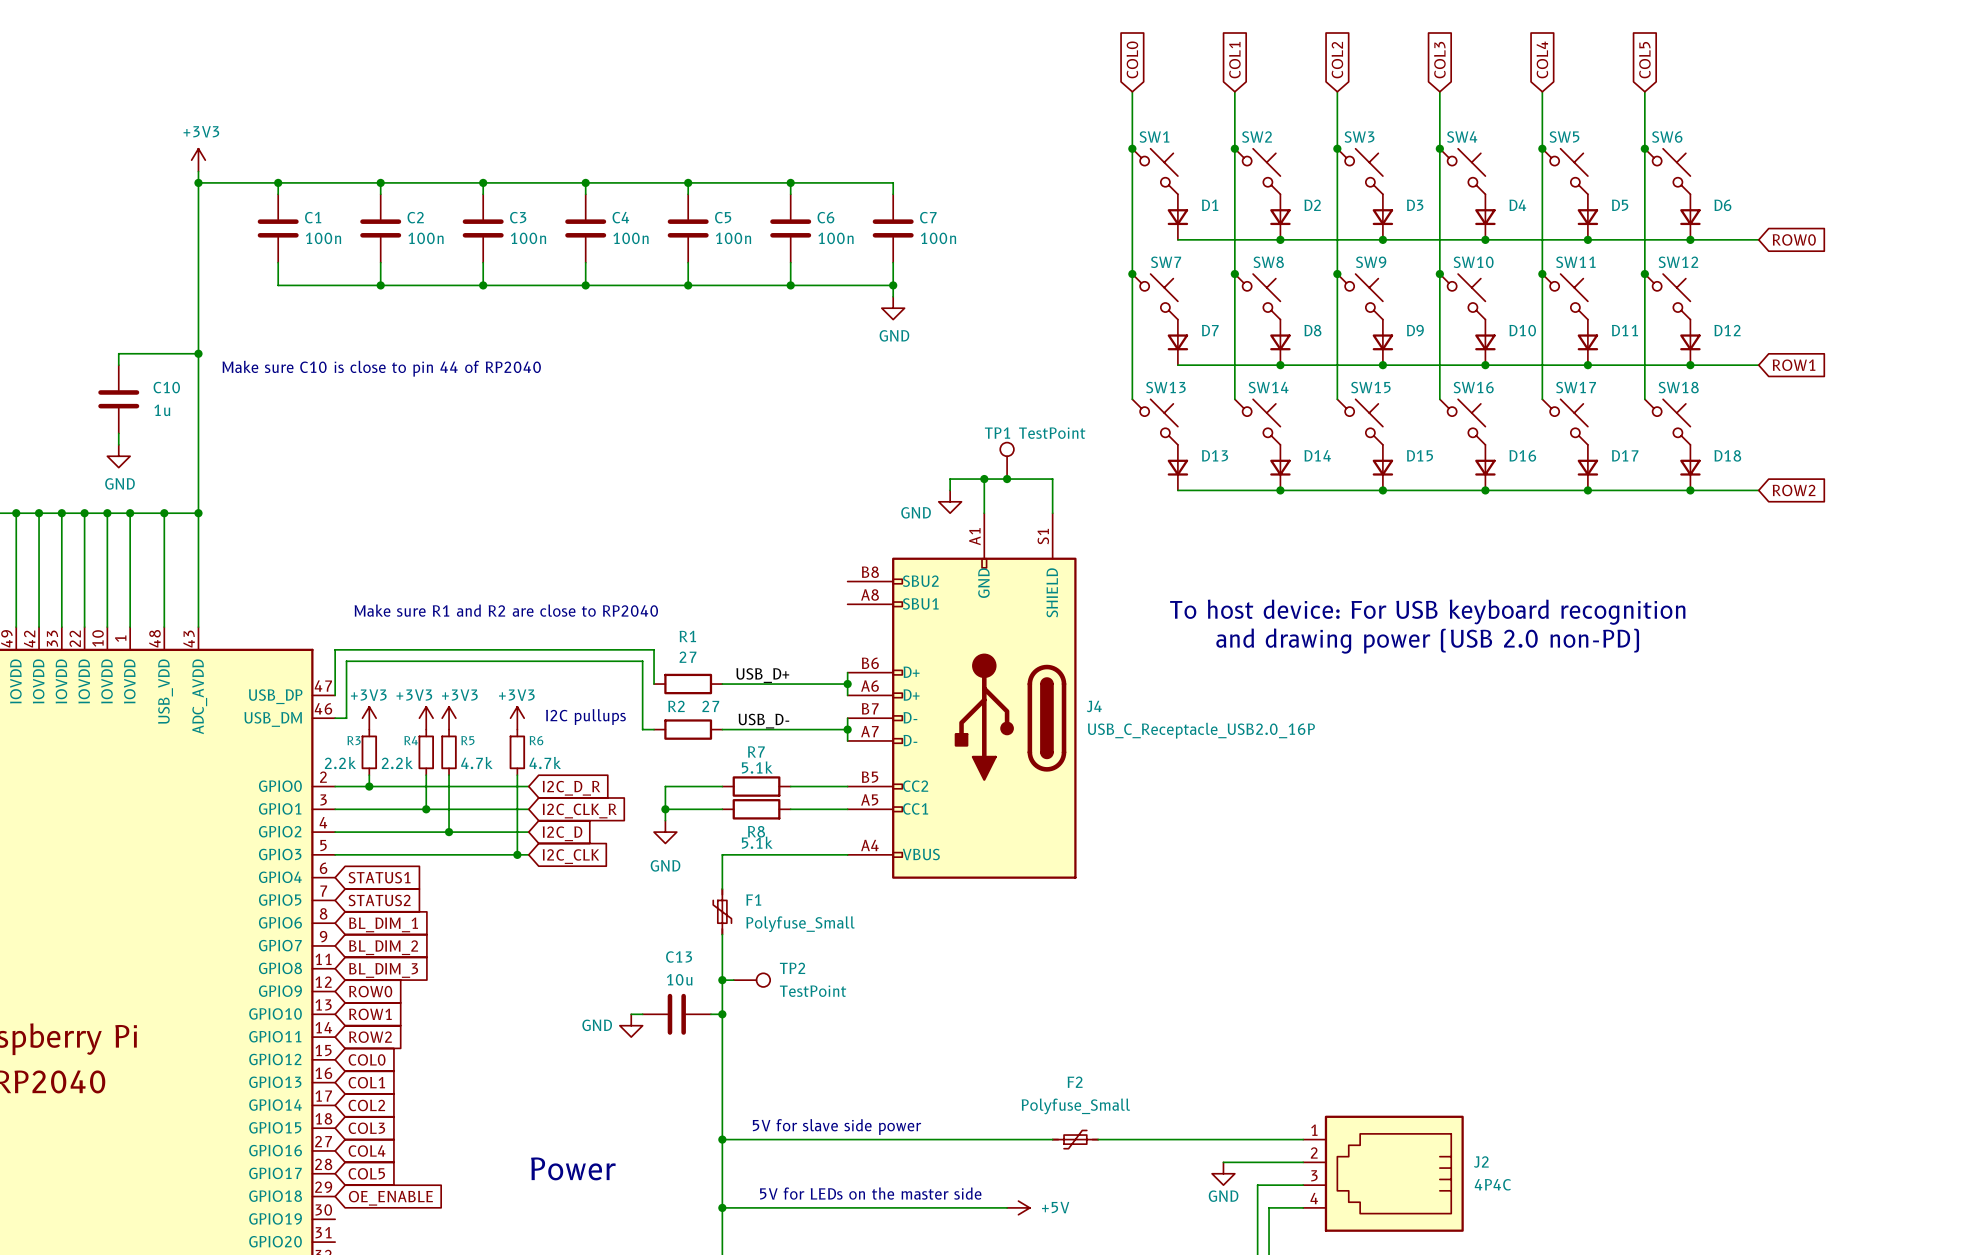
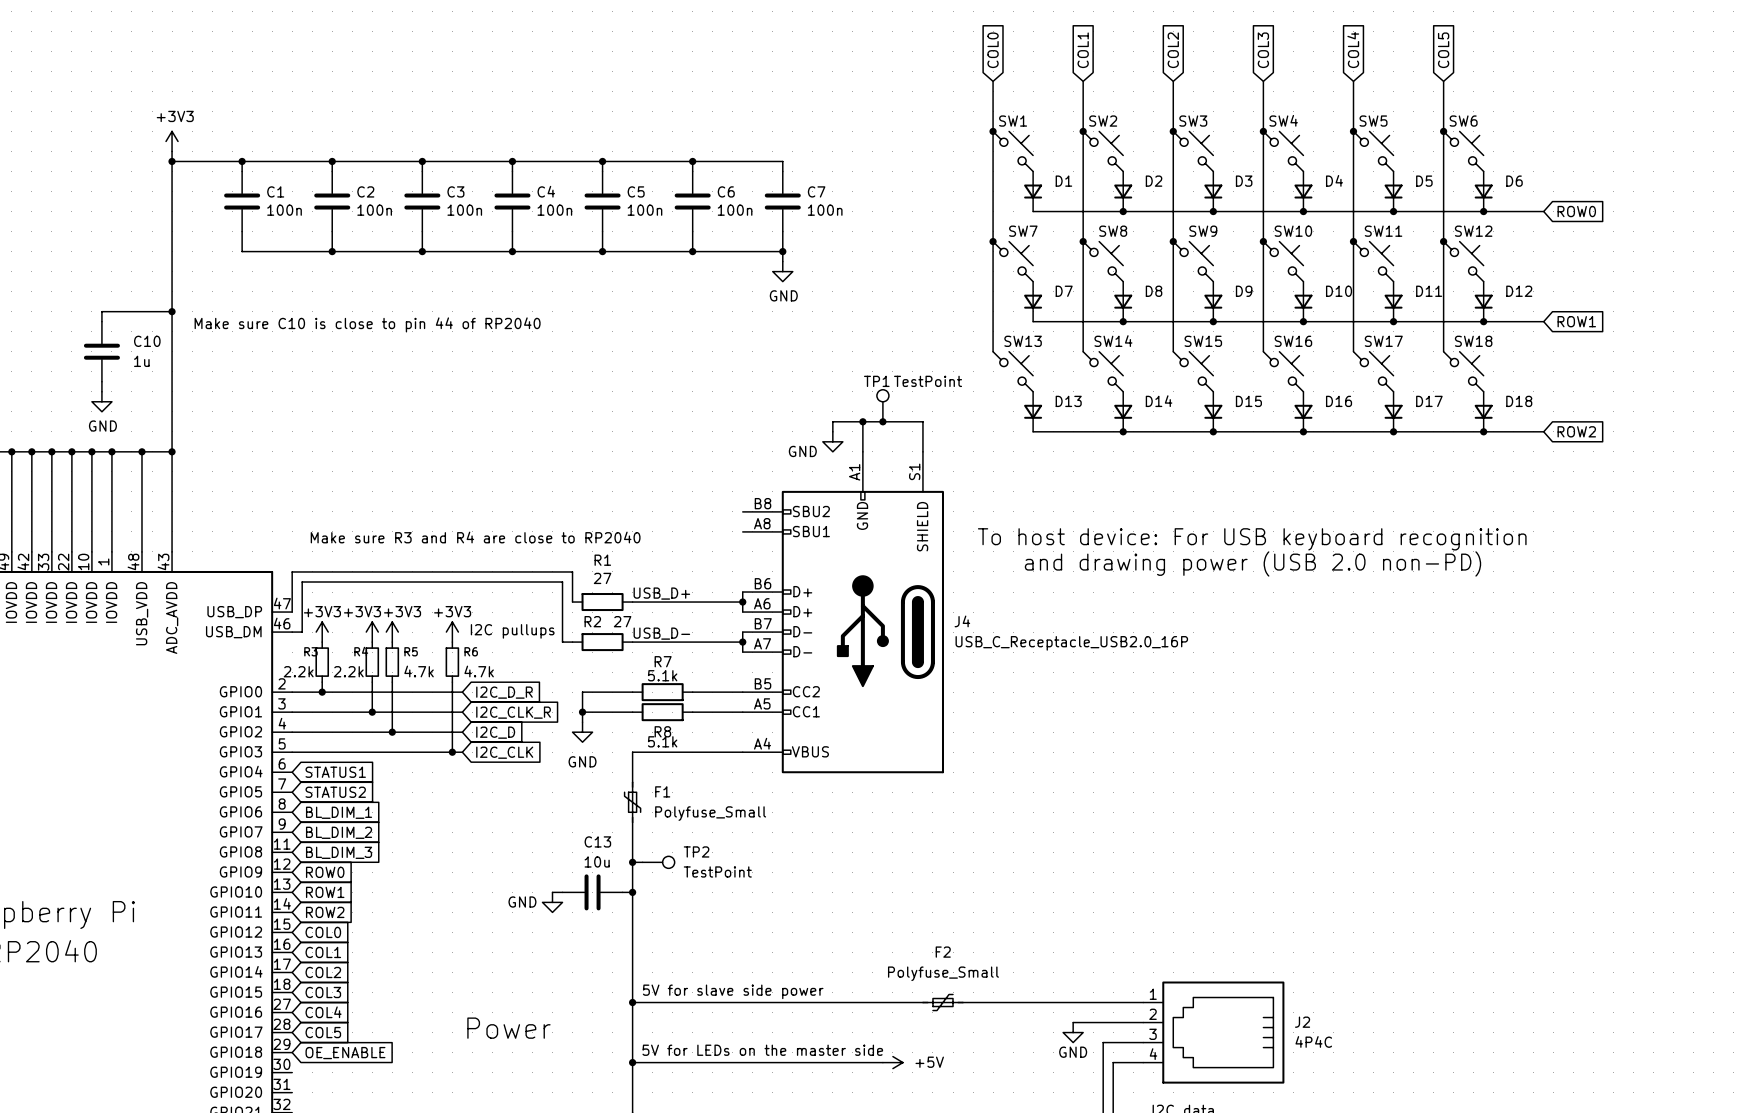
text: Make sure R1 and R2 are close to RP2040 (506, 610) -> Make sure R3 and R4 are close to RP2040 (475, 537)

